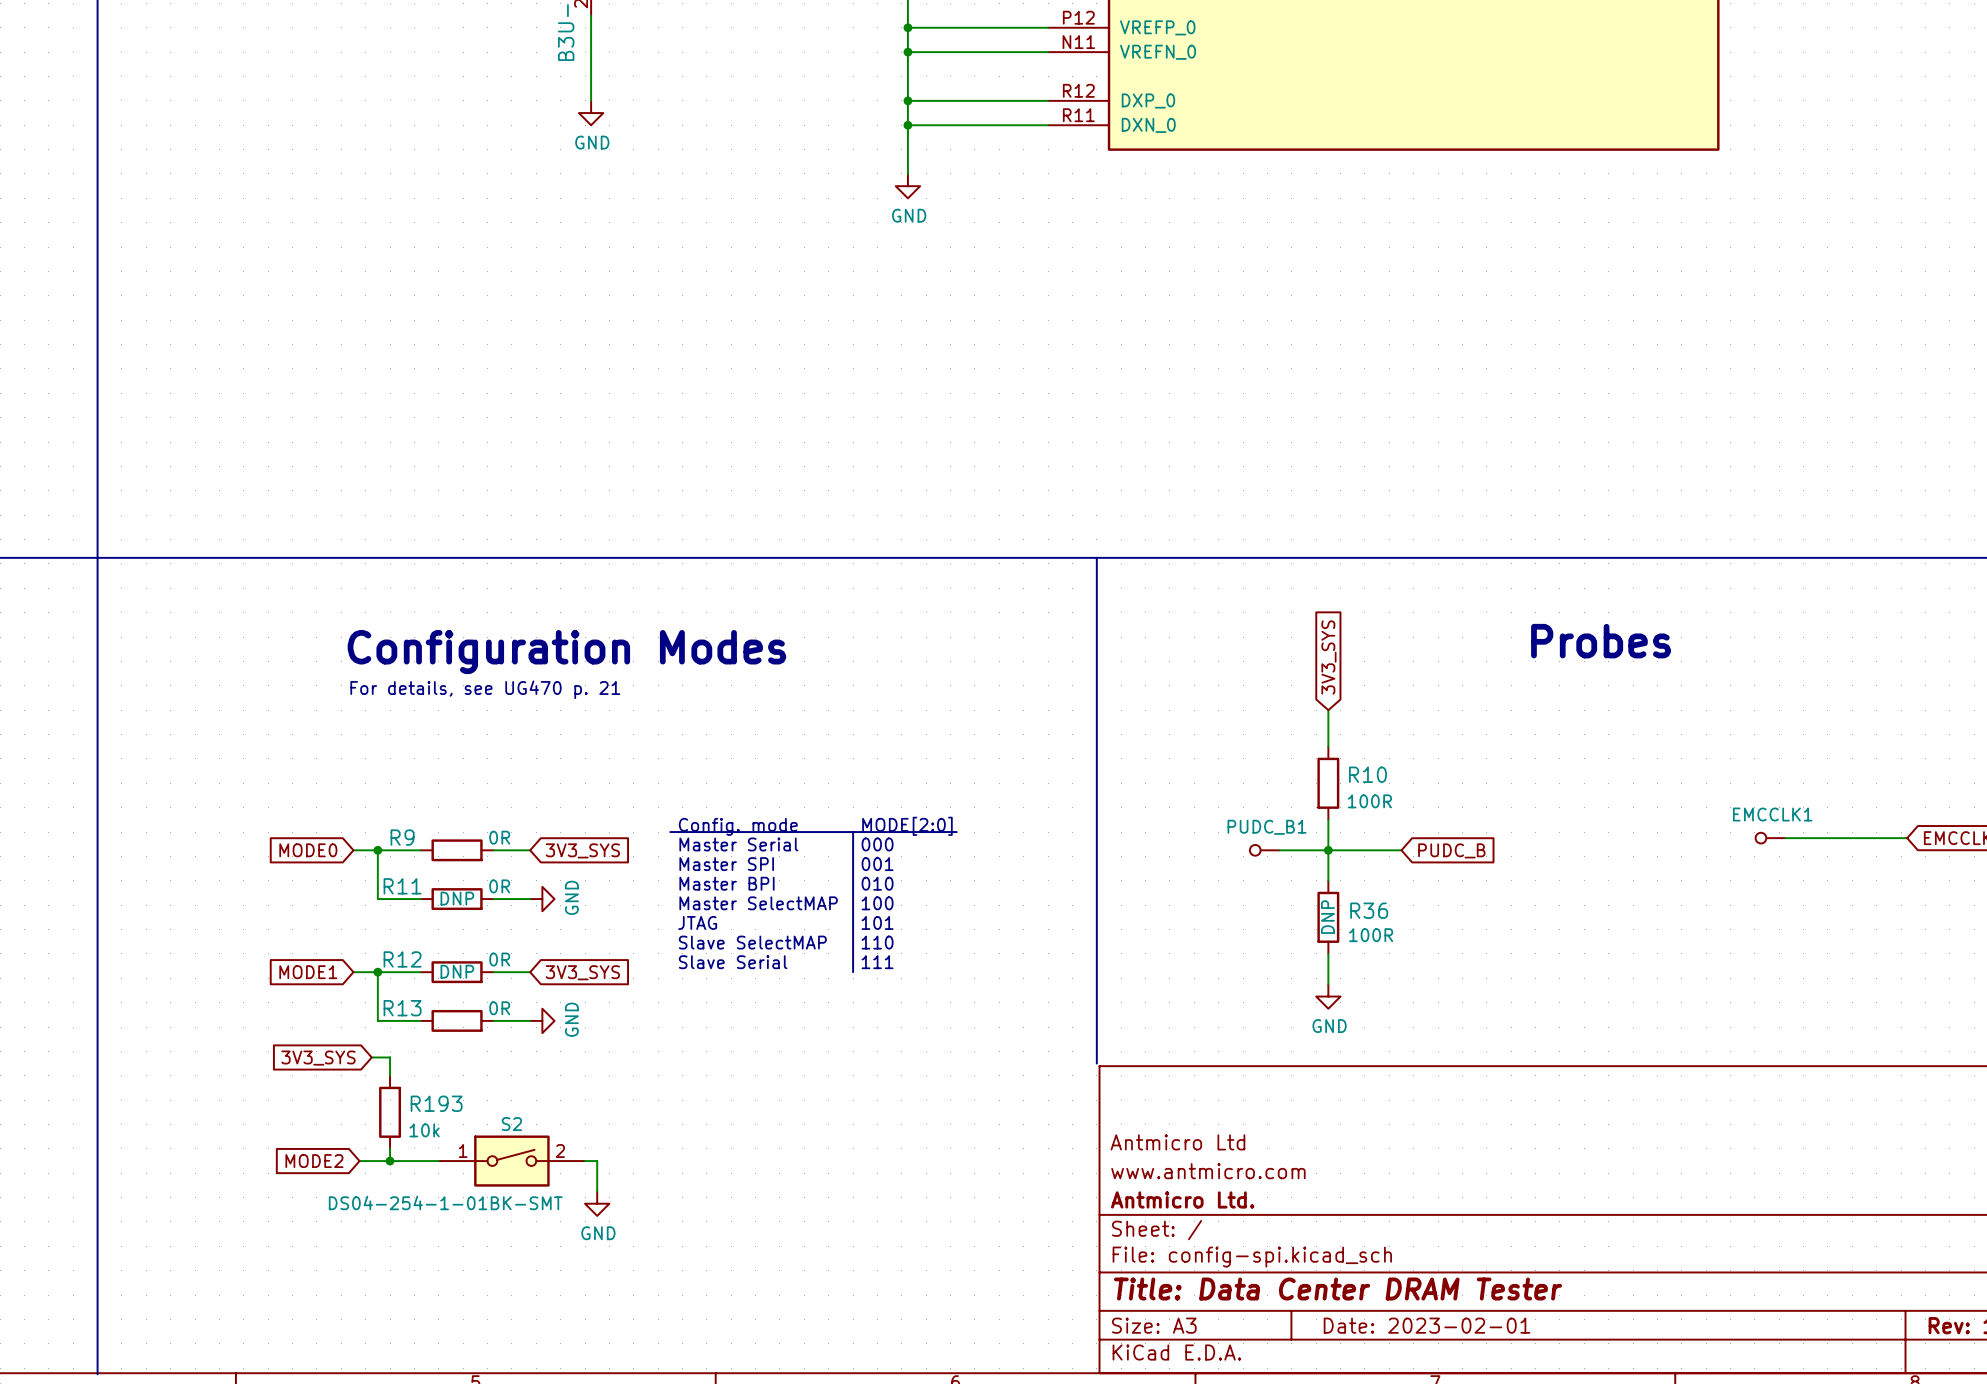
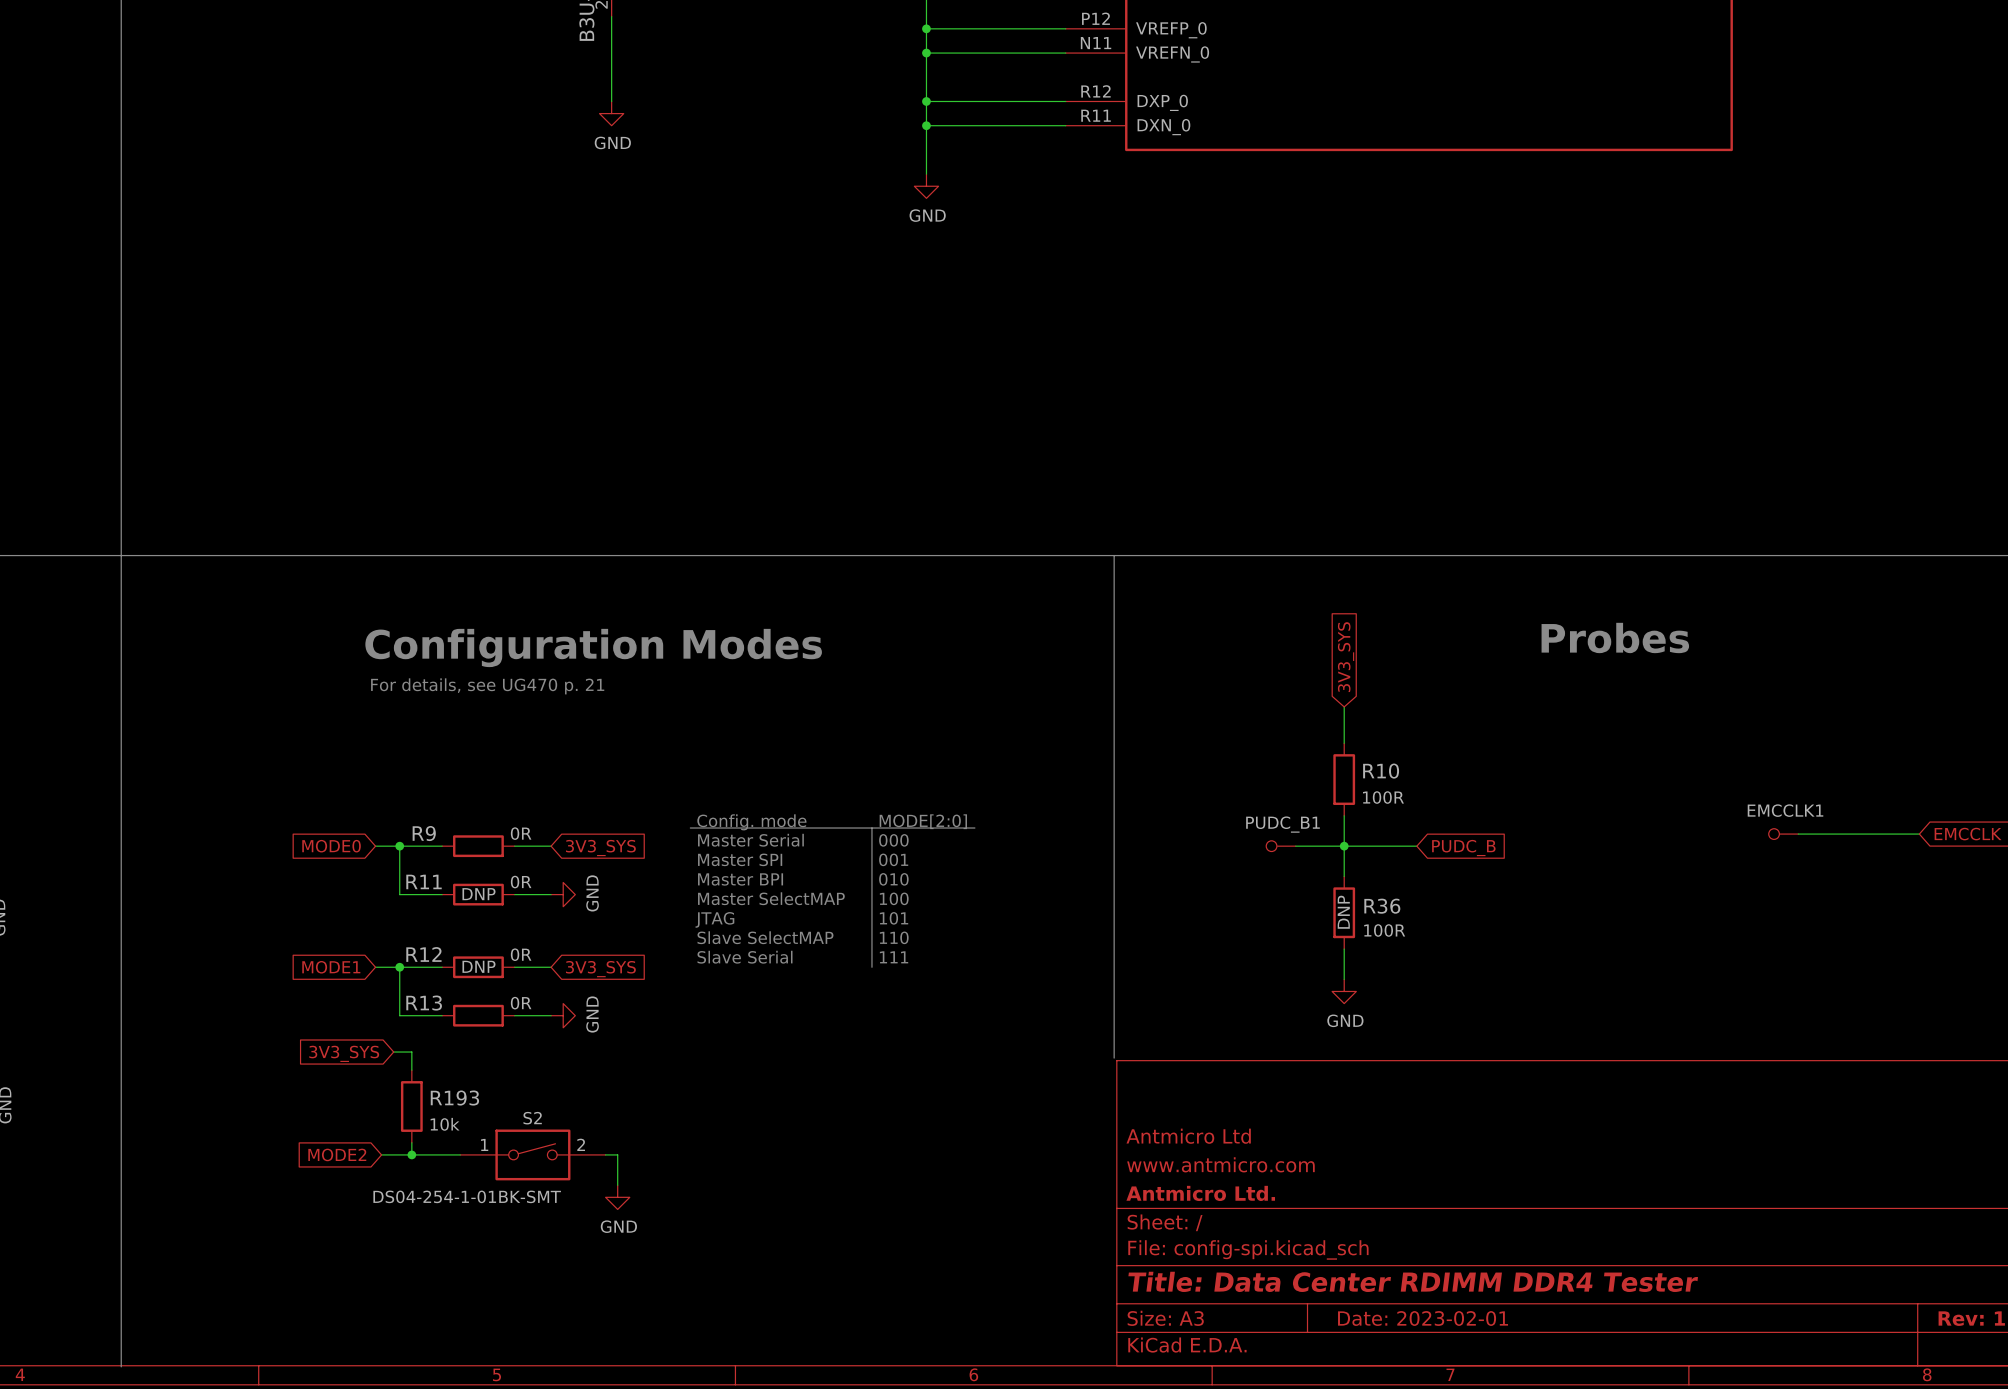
title block: Title: Data Center DRAM Tester (1337, 1289) -> Title: Data Center RDIMM DDR4 Tester (1413, 1281)

